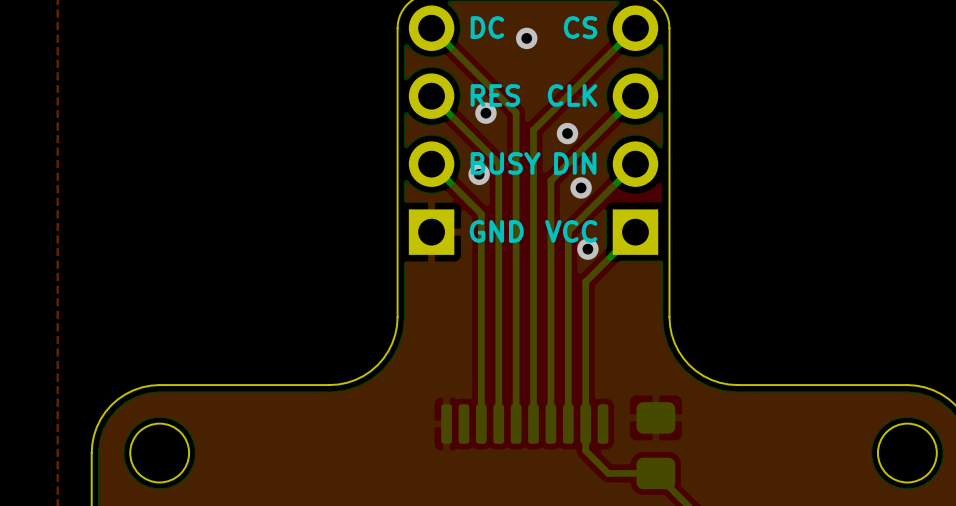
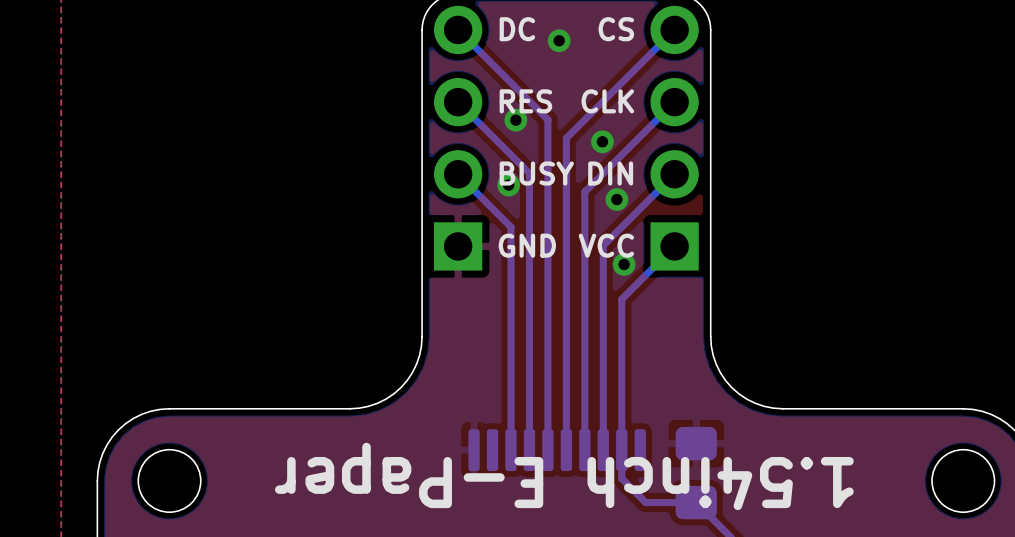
text: none -> 1.54inch E-Paper (564, 476)

